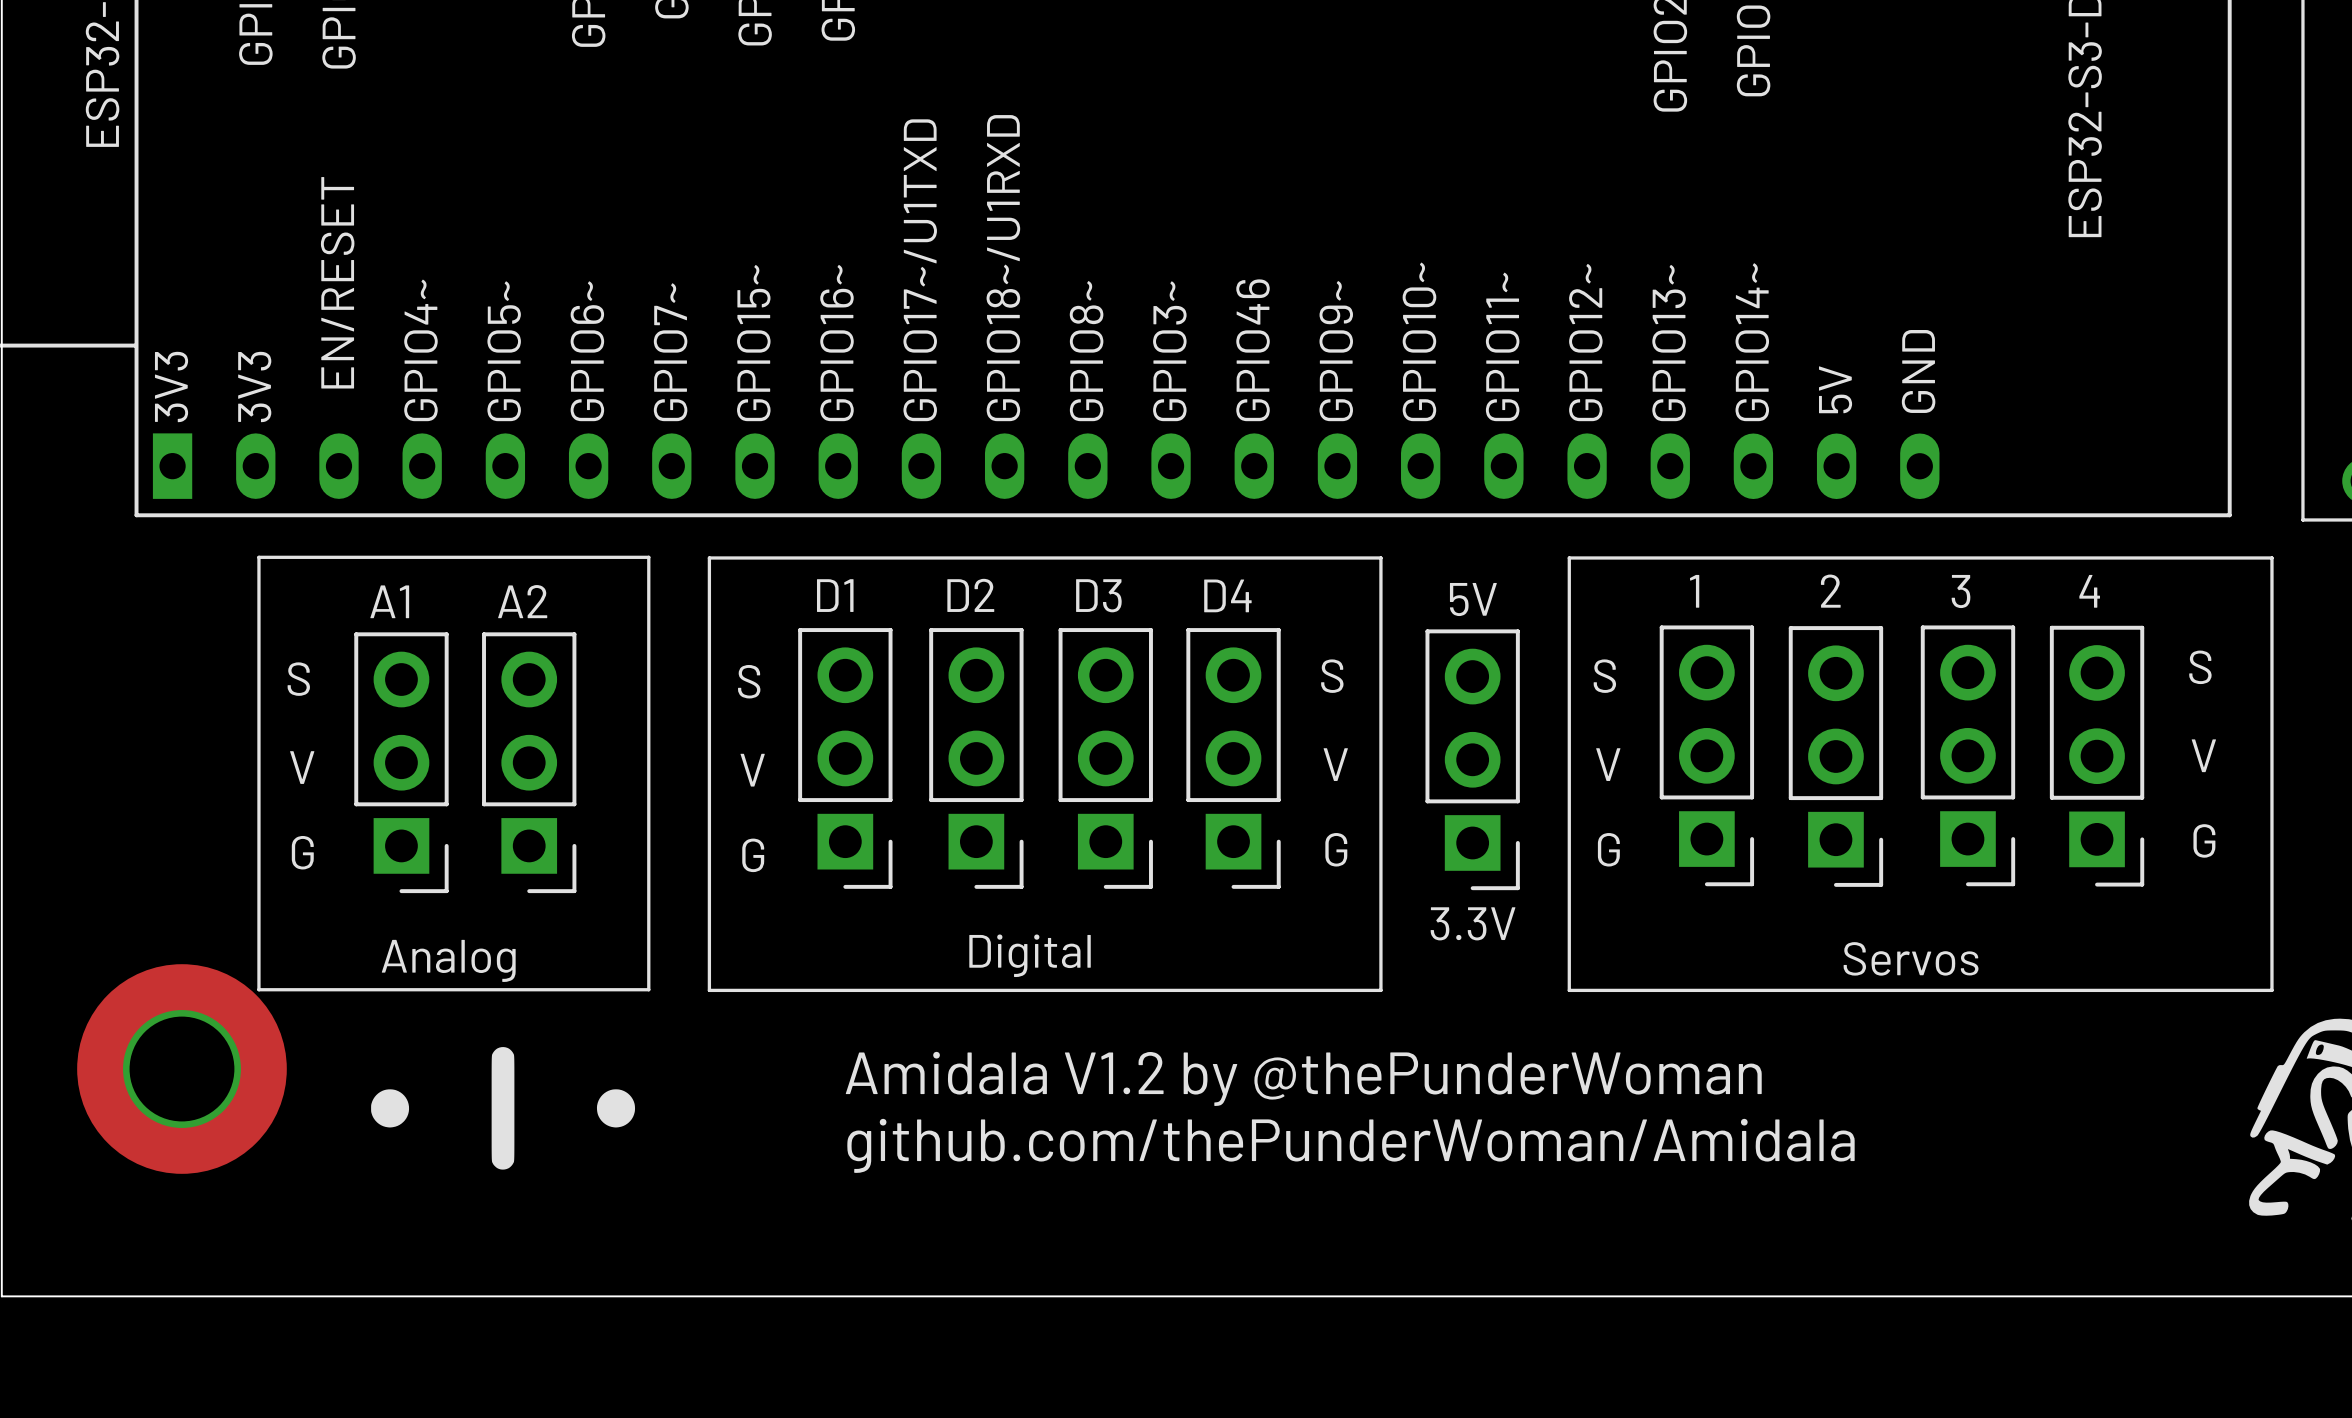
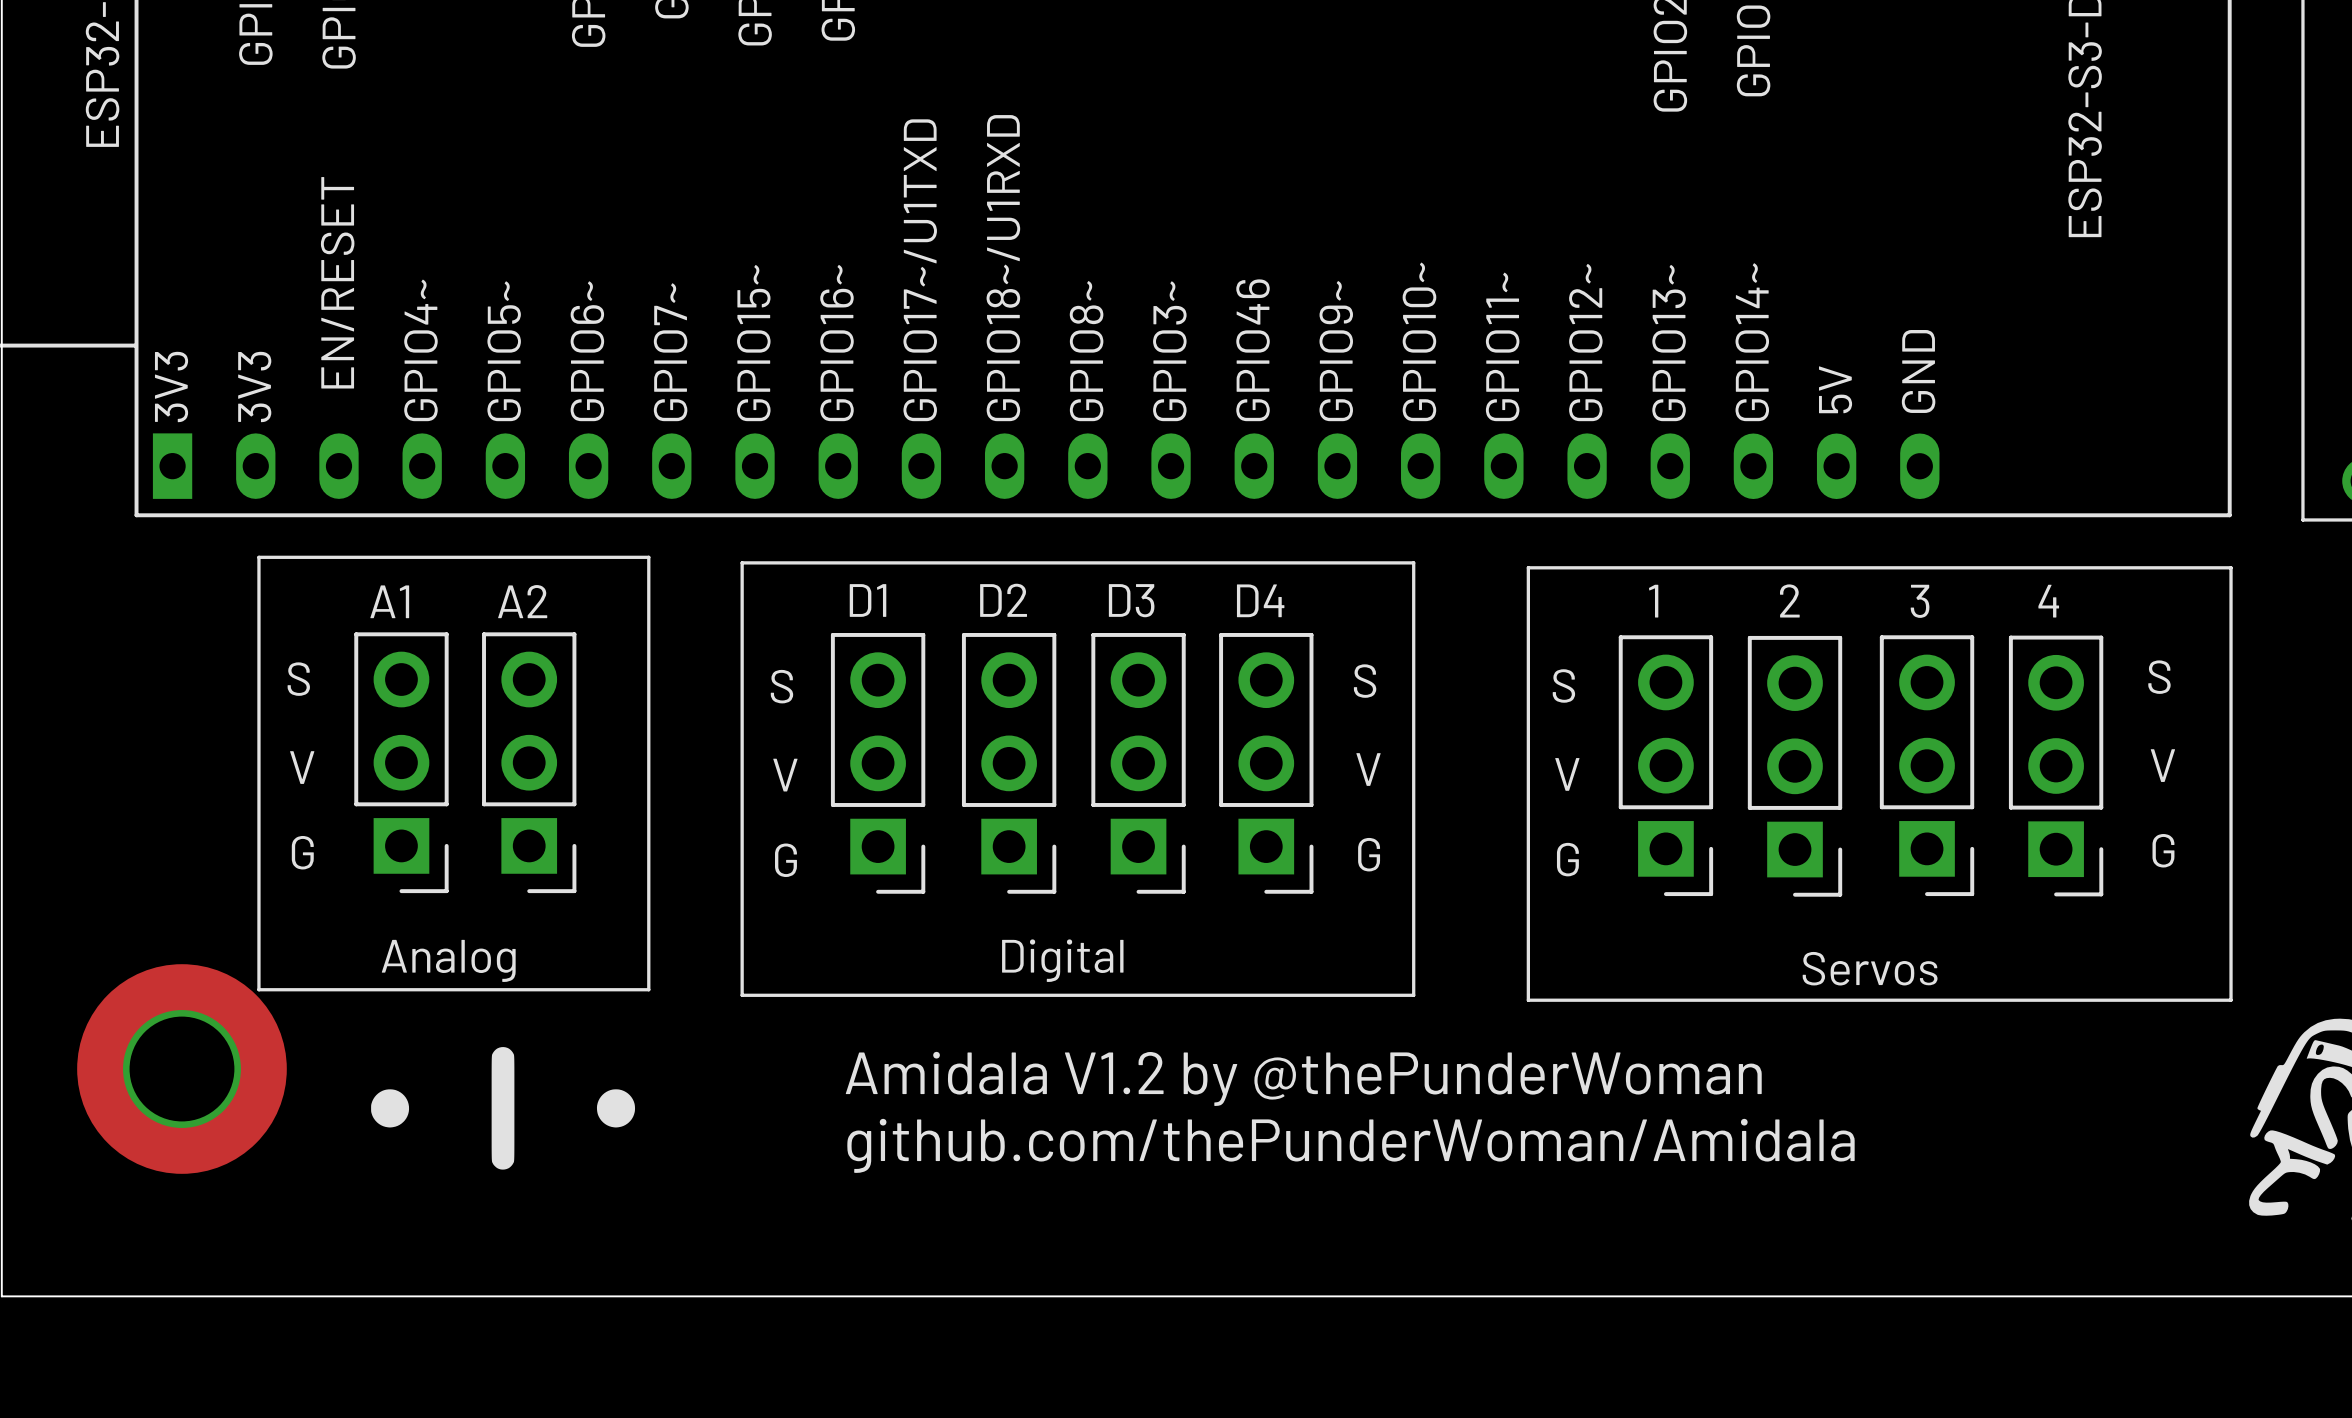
line: (709, 557) (1380, 557) (1380, 990) (709, 990) (709, 557) -> (742, 562) (1413, 562) (1413, 995) (742, 995) (742, 562)
line: (1569, 557) (2271, 557) (2271, 990) (1569, 990) (1569, 557) -> (1528, 567) (2231, 567) (2231, 1000) (1528, 1000) (1528, 567)
text position: 1 (1694, 591) -> 1 (1653, 601)
text position: 2 (1830, 591) -> 2 (1789, 600)
text position: 3 (1961, 591) -> 3 (1920, 601)
text position: 4 (2089, 591) -> 4 (2048, 601)
text position: D1 (835, 595) -> D1 (868, 600)
text position: D2 (970, 595) -> D2 (1003, 600)
text position: D3 (1098, 595) -> D3 (1131, 600)
text position: D4 (1227, 595) -> D4 (1260, 600)
text: 5V (1473, 599) -> none
text position: S (2200, 667) -> S (2159, 677)
text position: S (1332, 676) -> S (1365, 681)
text position: S (1604, 676) -> S (1563, 685)
text position: S (749, 681) -> S (781, 686)
part position: (1706, 755) -> (1665, 765)
part position: (1967, 755) -> (1927, 765)
text position: V (2203, 755) -> V (2162, 765)
part position: (1835, 756) -> (1795, 766)
part position: (2097, 756) -> (2056, 765)
part position: (845, 758) -> (878, 763)
part position: (976, 758) -> (1009, 763)
part position: (1105, 758) -> (1138, 763)
part position: (1233, 758) -> (1266, 763)
part: (1472, 759) -> none
text position: V (1335, 764) -> V (1368, 769)
text position: V (1608, 764) -> V (1567, 774)
text position: V (752, 770) -> V (785, 775)
text position: G (2204, 840) -> G (2163, 850)
text position: G (1336, 849) -> G (1369, 854)
text position: G (1608, 849) -> G (1567, 859)
text position: G (753, 855) -> G (785, 860)
text: 3.3V (1473, 923) -> none
text position: Digital (1030, 955) -> Digital (1062, 960)
text position: Servos (1911, 958) -> Servos (1870, 968)

